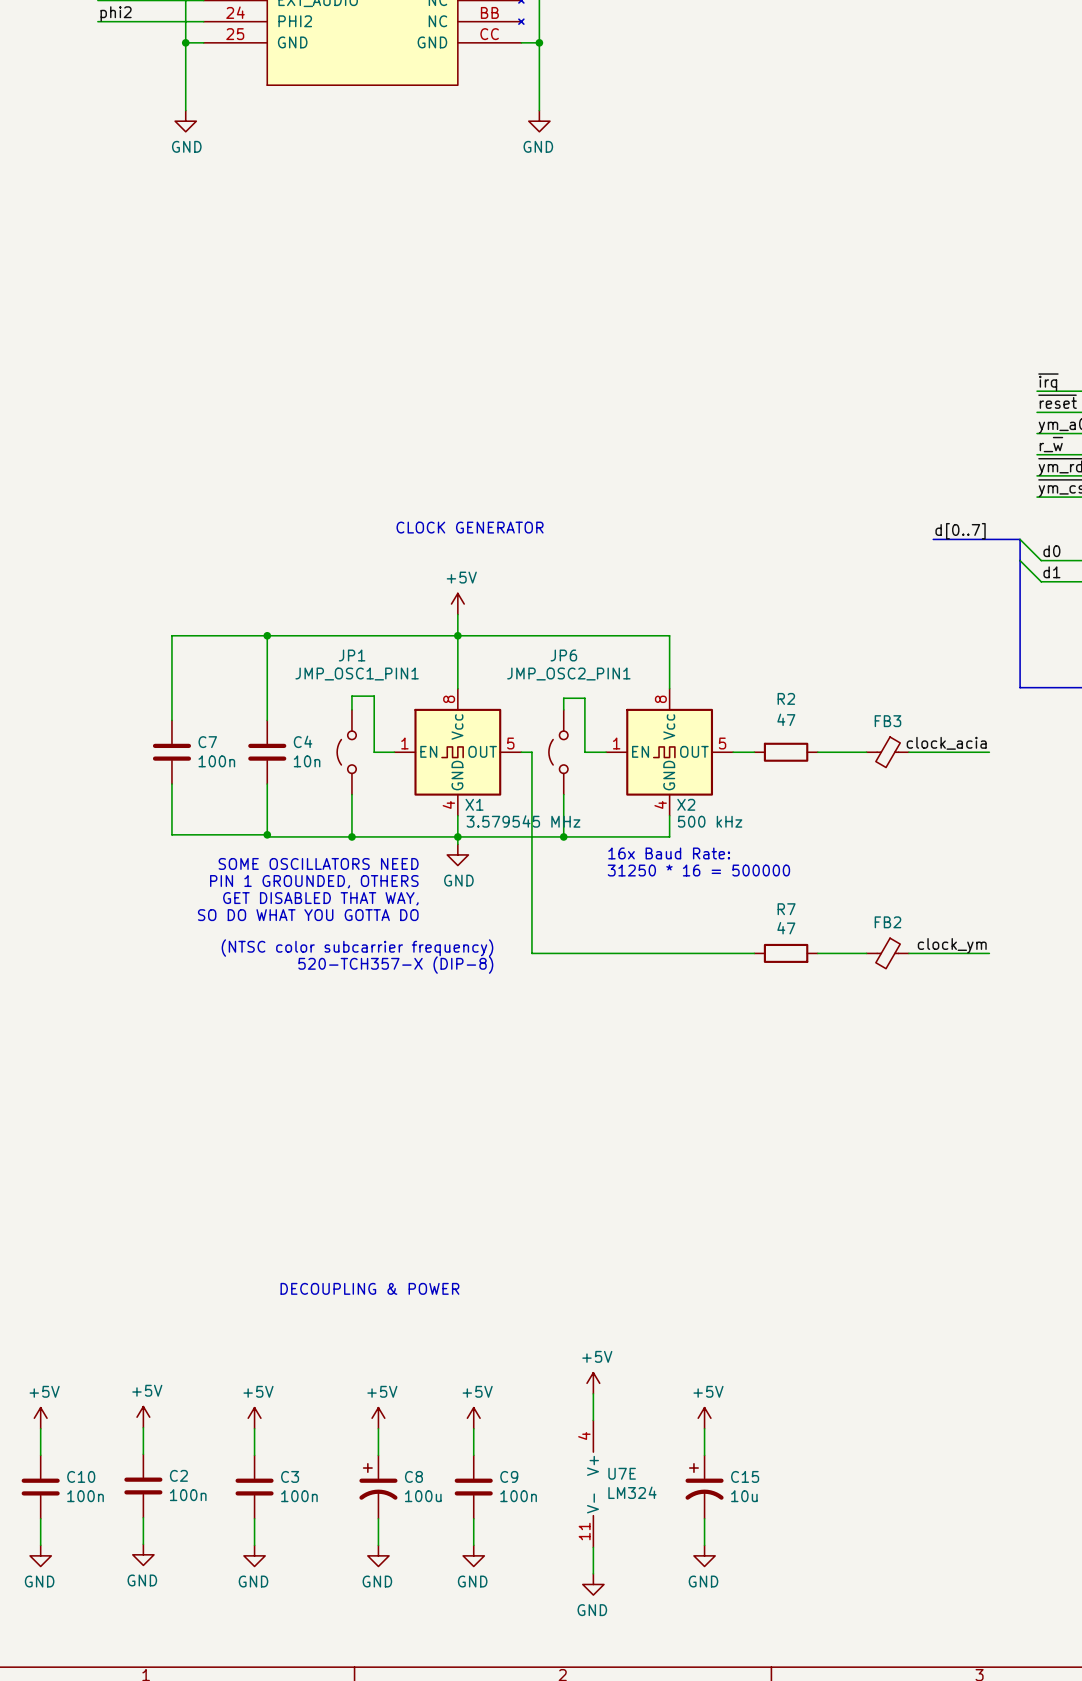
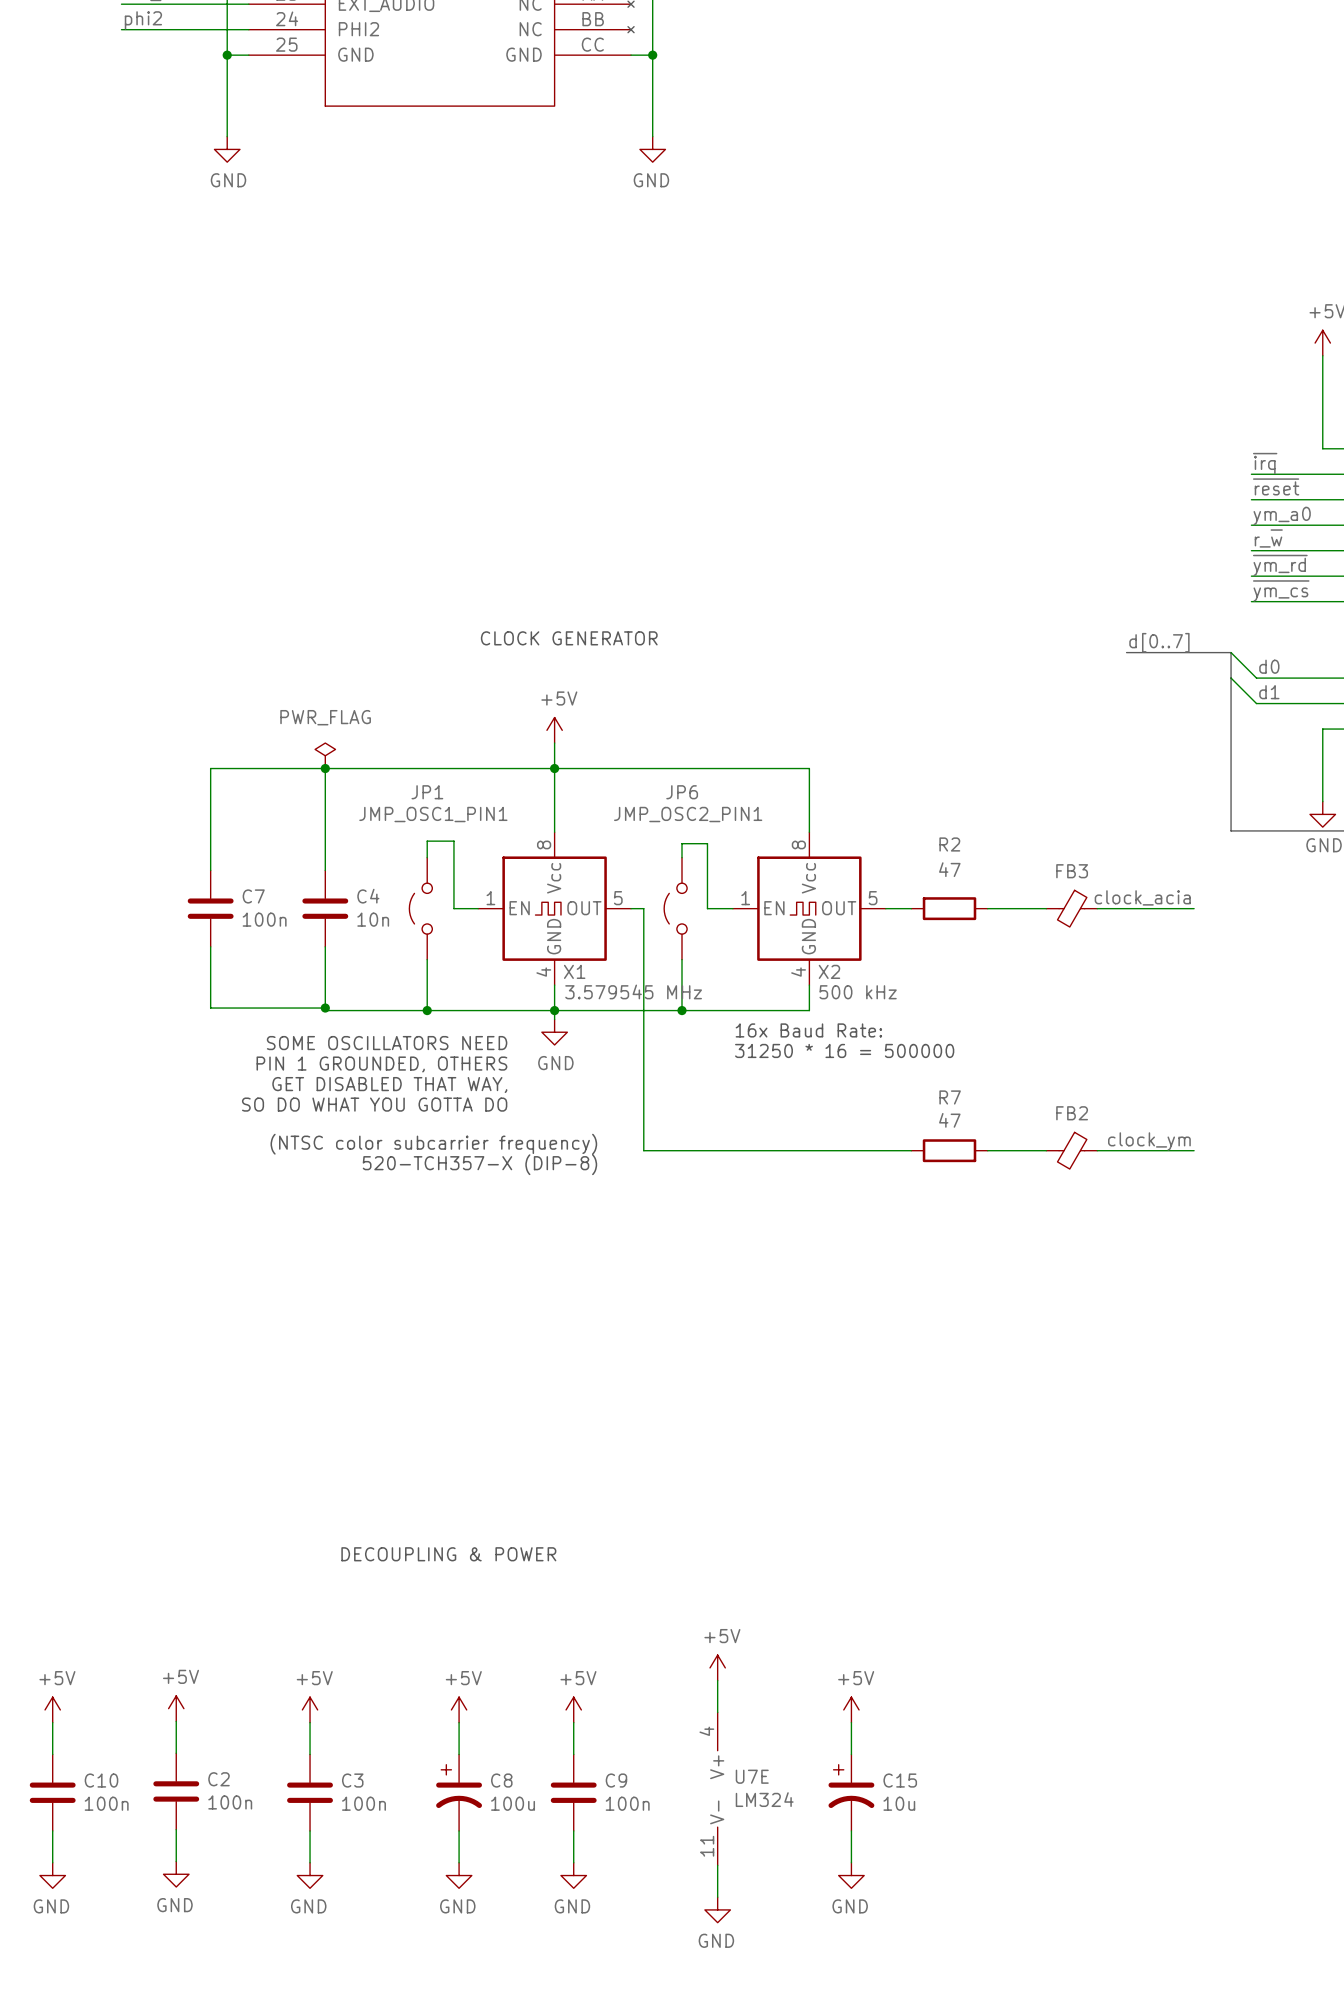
power symbol: none -> PWR_FLAG (325, 755)

